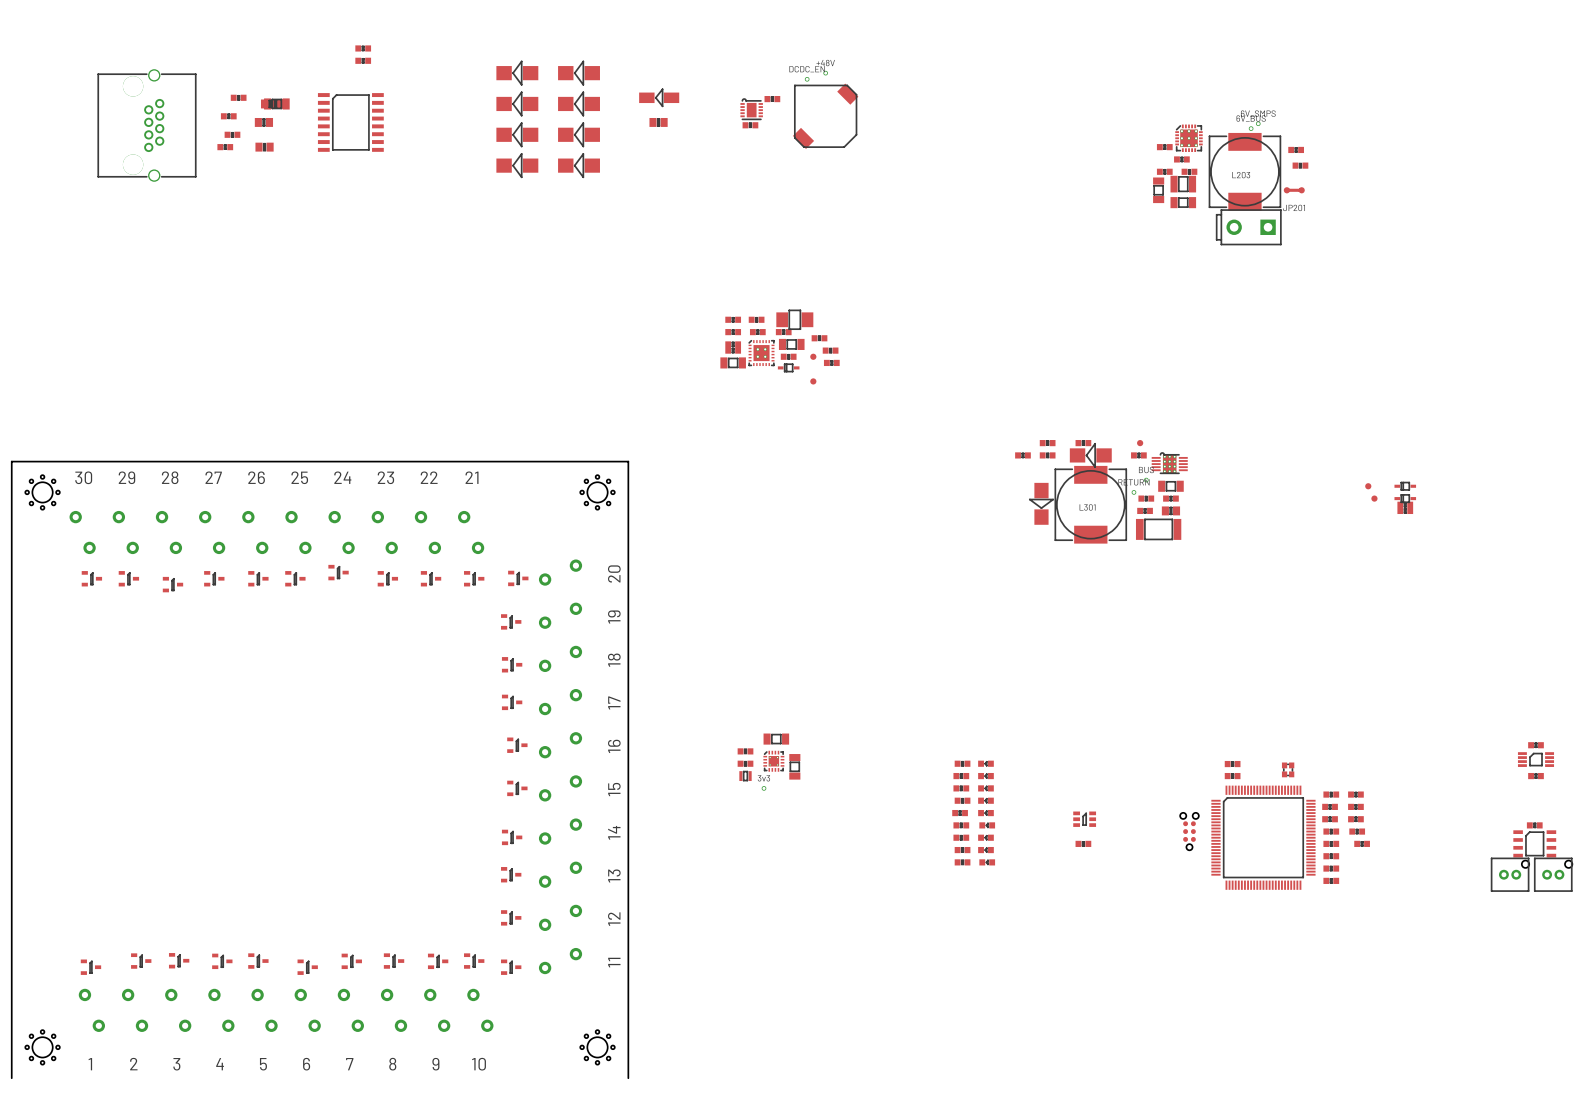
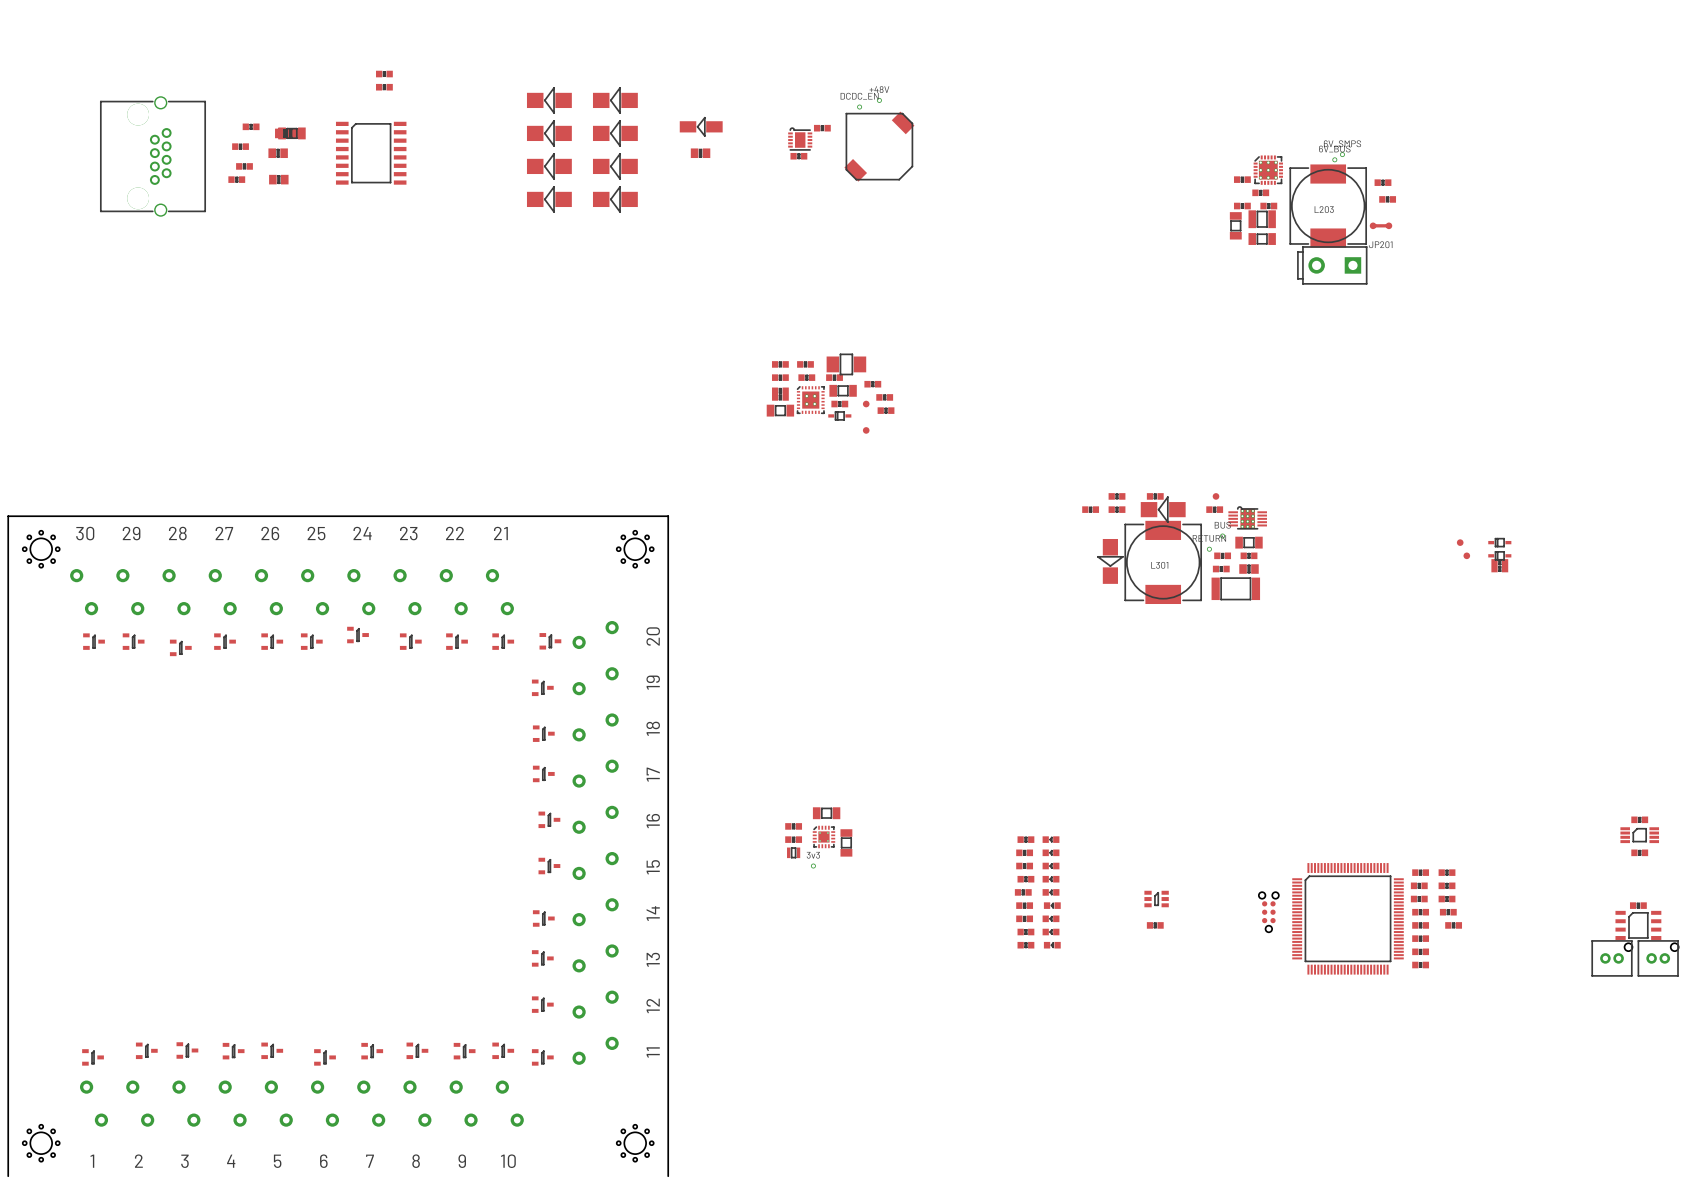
part: (1232, 764) -> none
part: (1288, 769) -> none
part: (1232, 776) -> none

